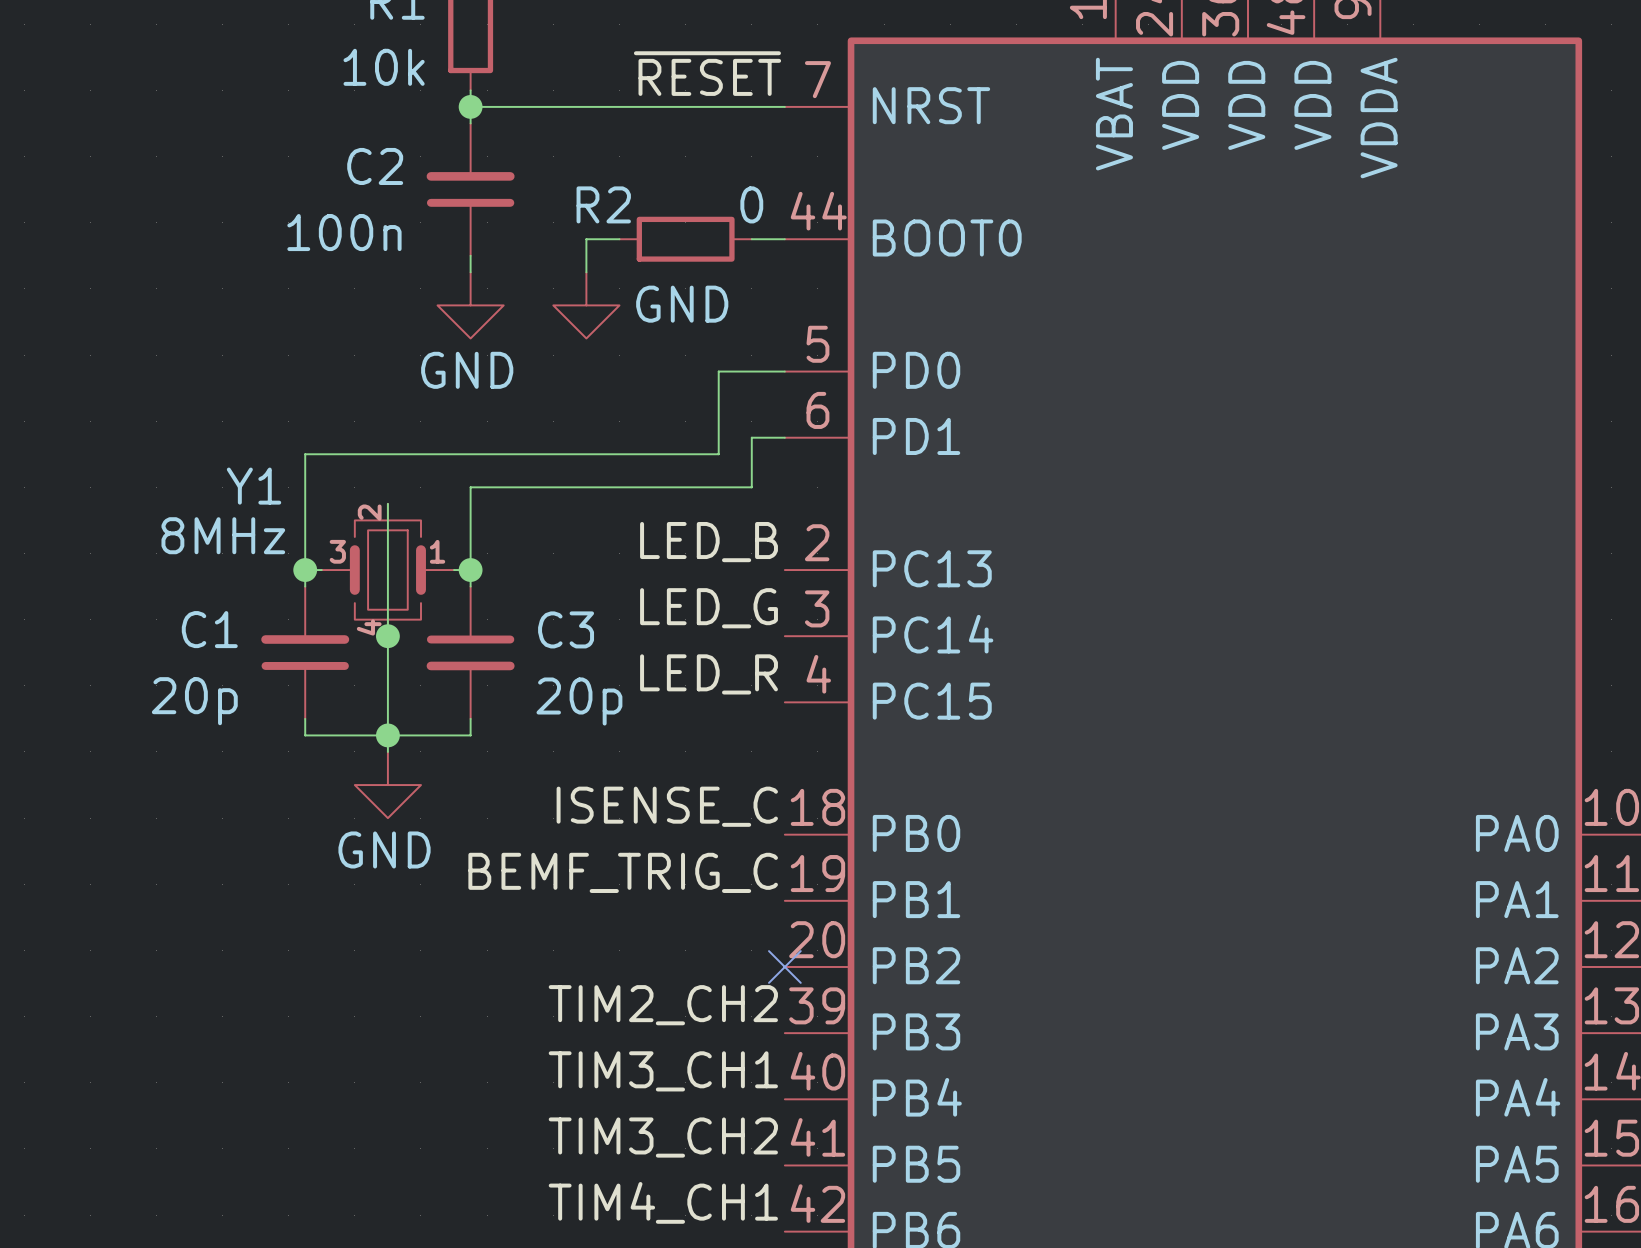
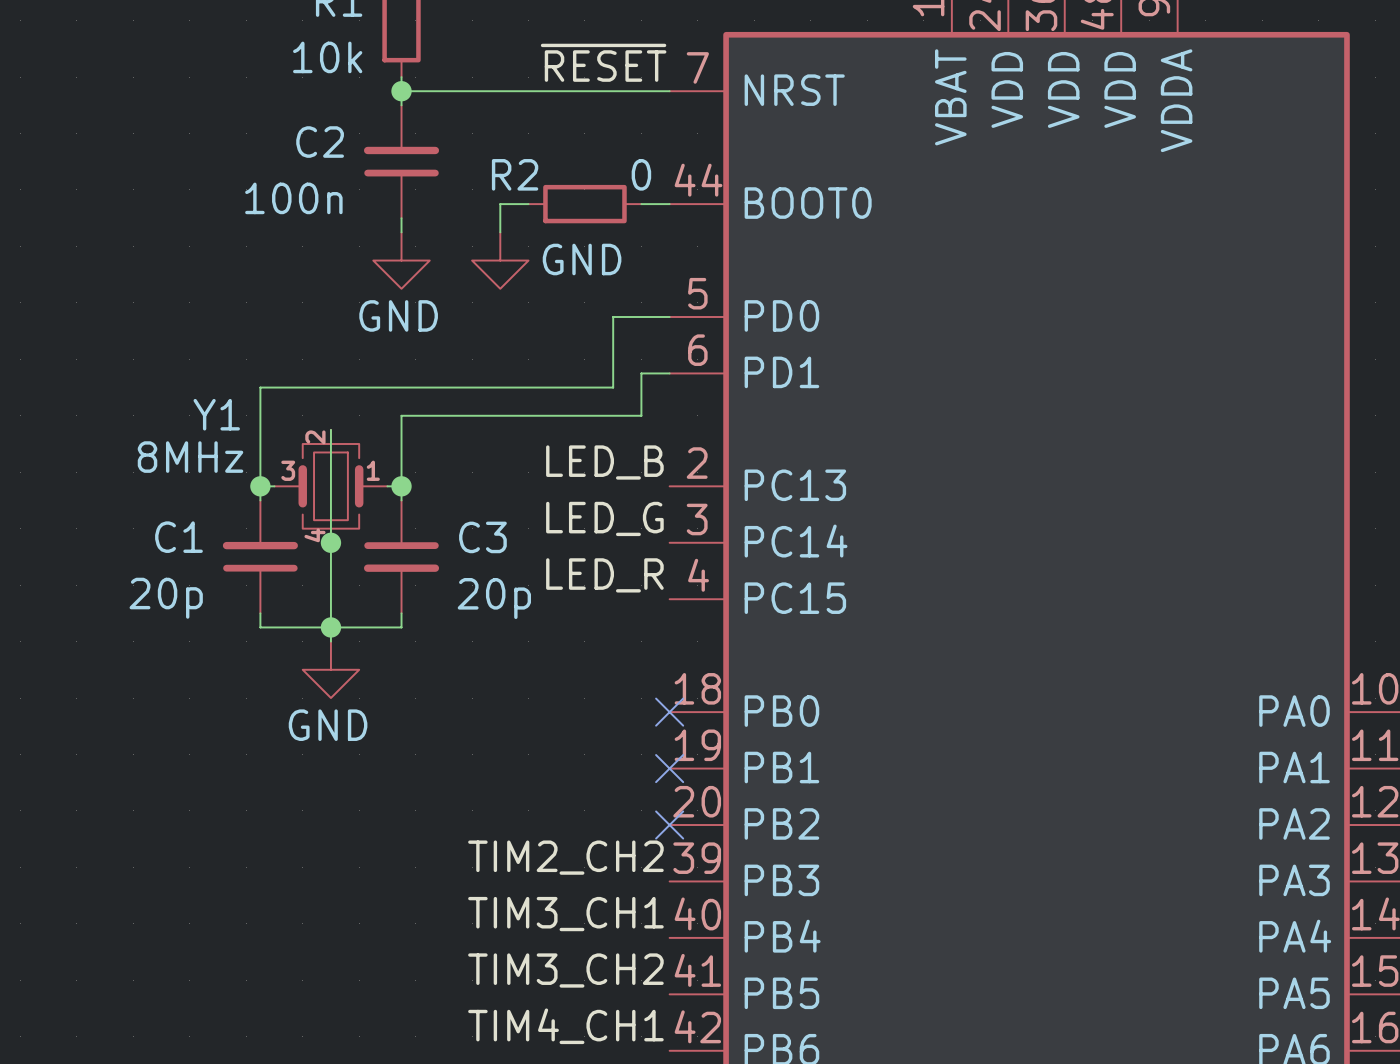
label: ISENSE_C (667, 806) -> none
no-connect mark: none -> (669, 712)
label: BEMF_TRIG_C (623, 872) -> none
no-connect mark: none -> (669, 768)

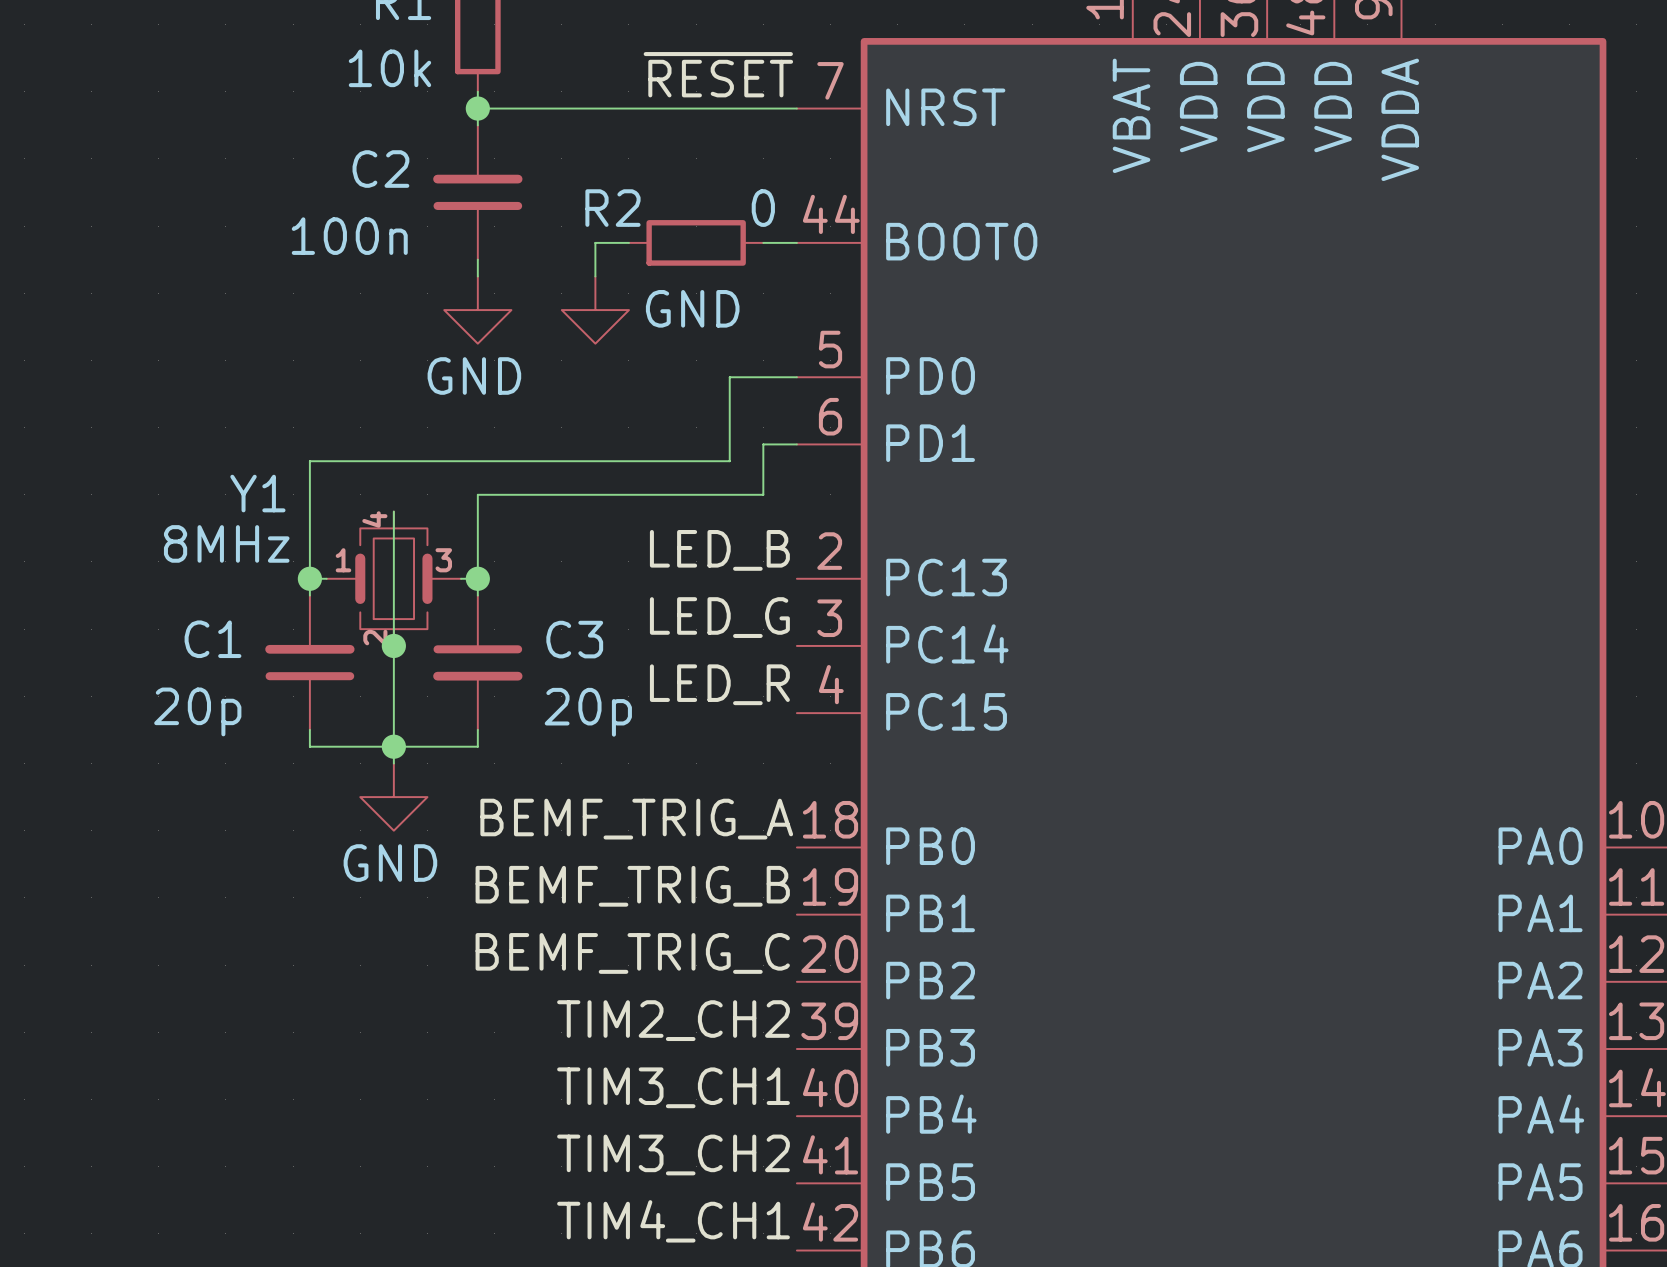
Y1 rotation: 0° (330, 486) -> 180° (393, 578)
label: none -> BEMF_TRIG_A (636, 819)
no-connect mark: (669, 712) -> none
label: none -> BEMF_TRIG_B (632, 886)
no-connect mark: (669, 768) -> none
label: none -> BEMF_TRIG_C (632, 953)
no-connect mark: (669, 825) -> none

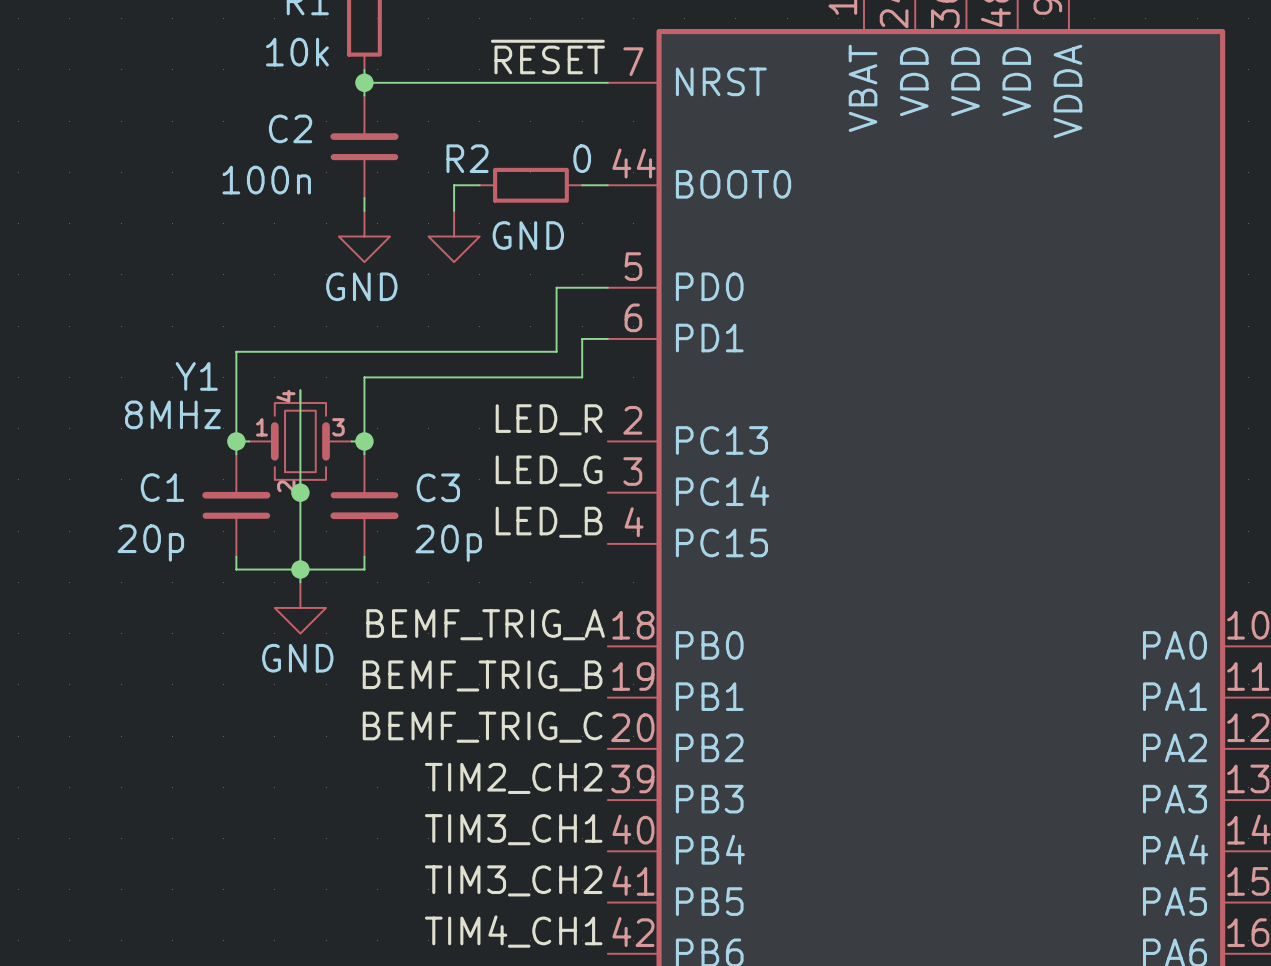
label: LED_B (719, 550) -> LED_R (549, 419)
label: LED_R (719, 684) -> LED_B (549, 522)

